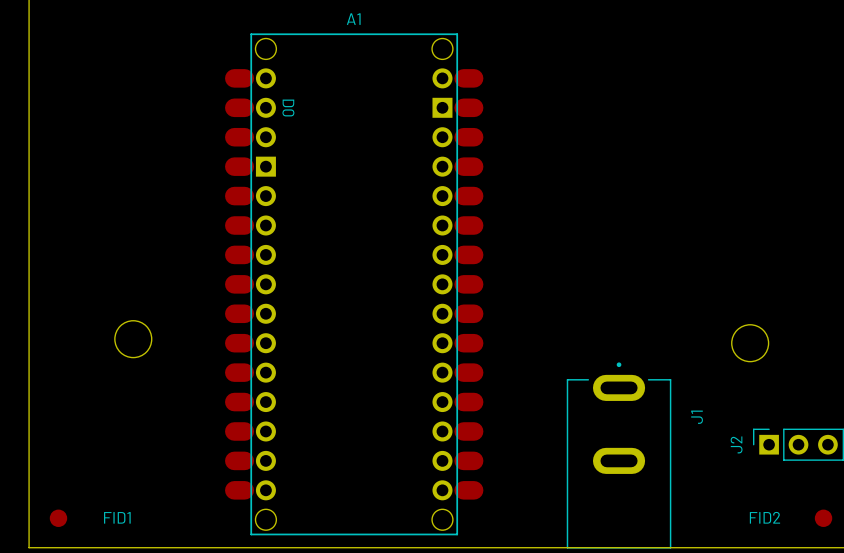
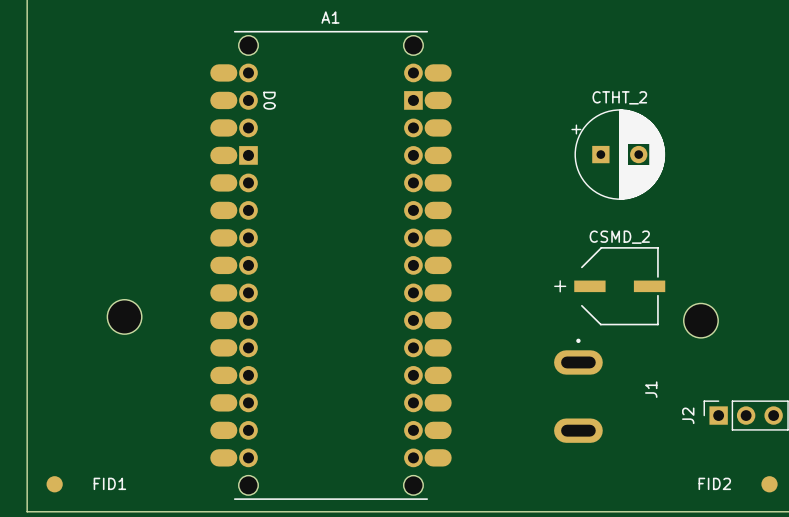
A1 footprint: [225, 33, 484, 536] -> [210, 30, 452, 500]
CTHT_2: none -> (618, 154)
CSMD_2: none -> (609, 286)
J1 footprint: [566, 362, 672, 549] -> [554, 338, 603, 443]

